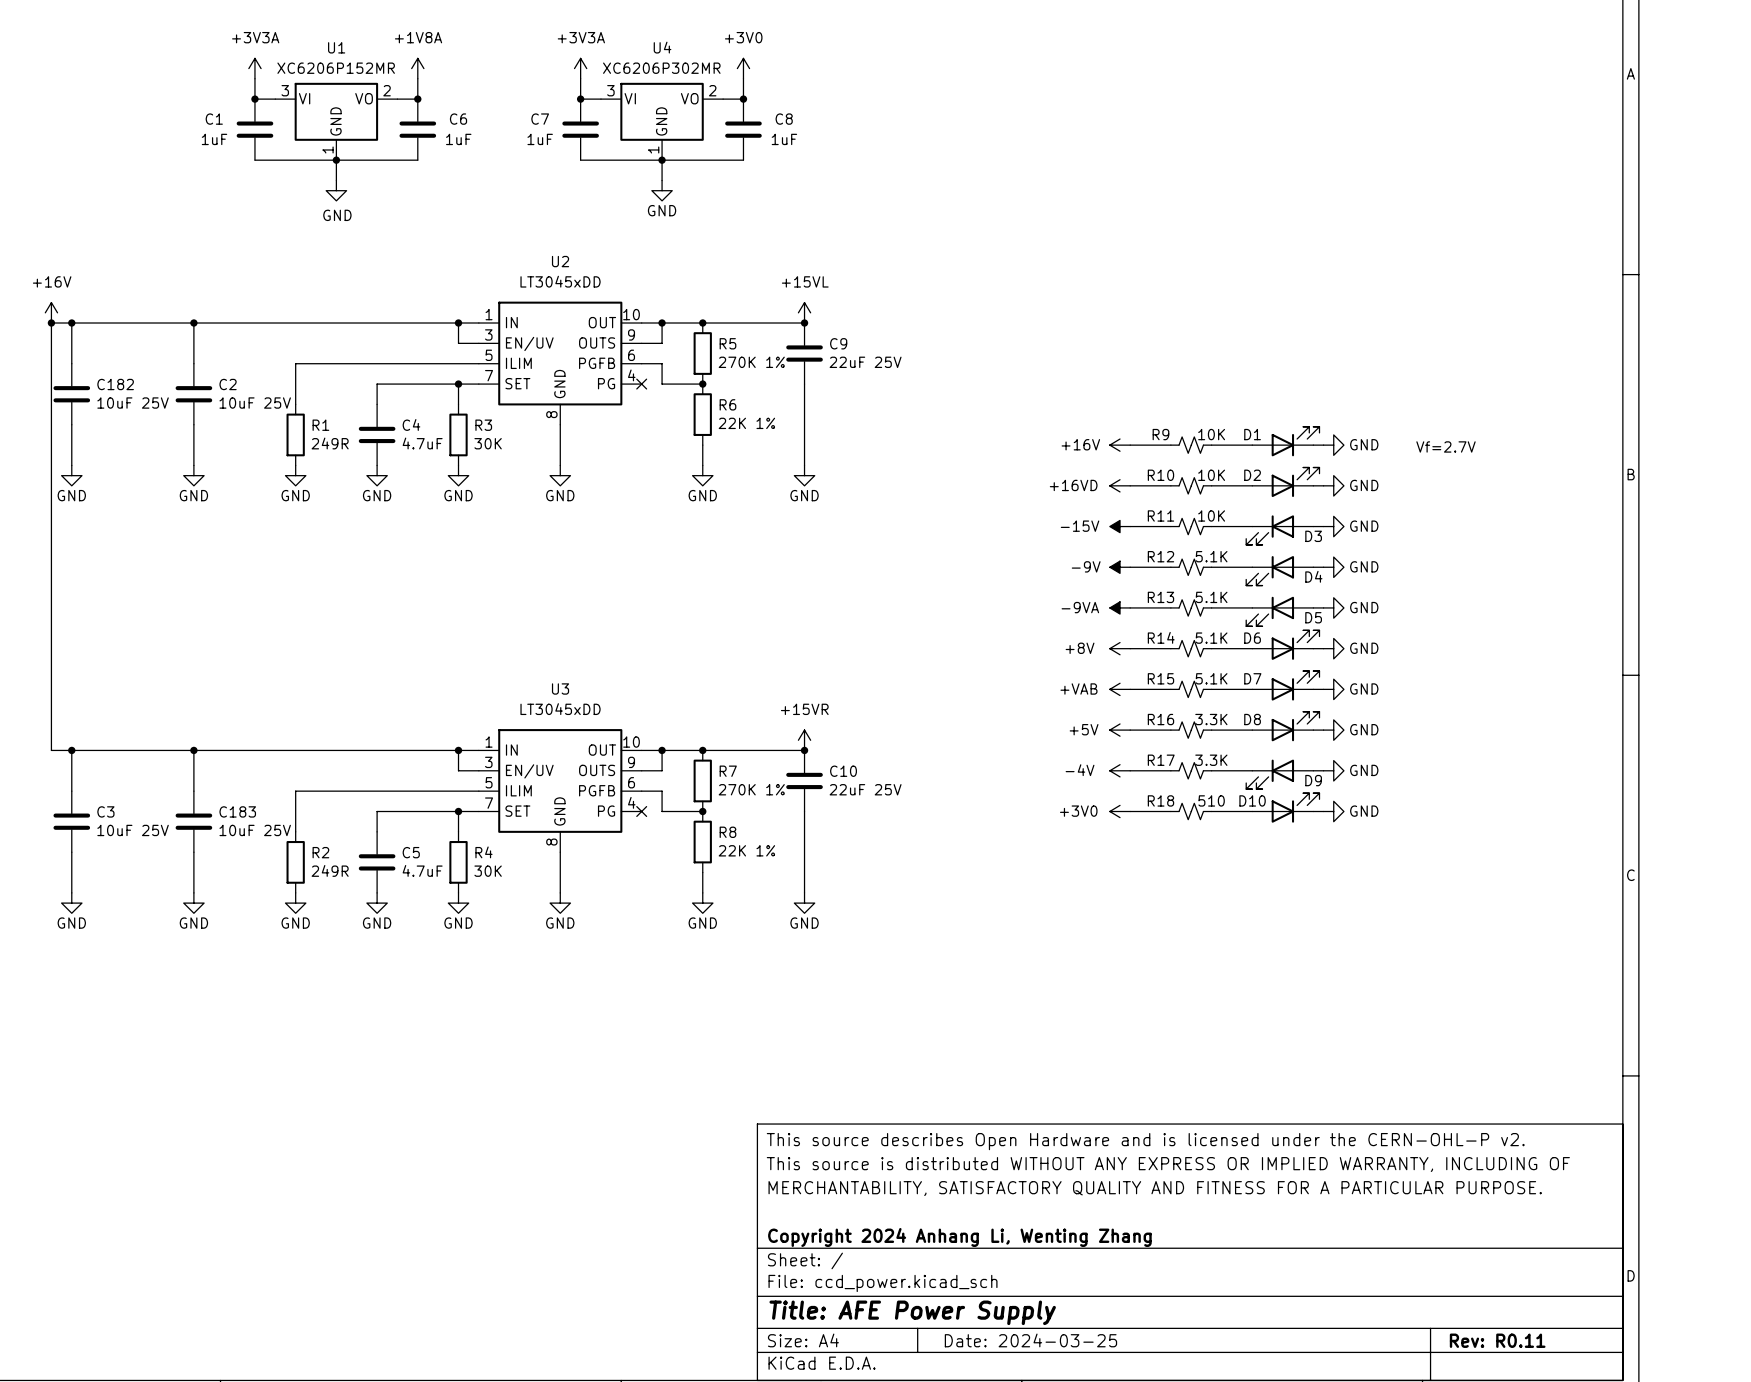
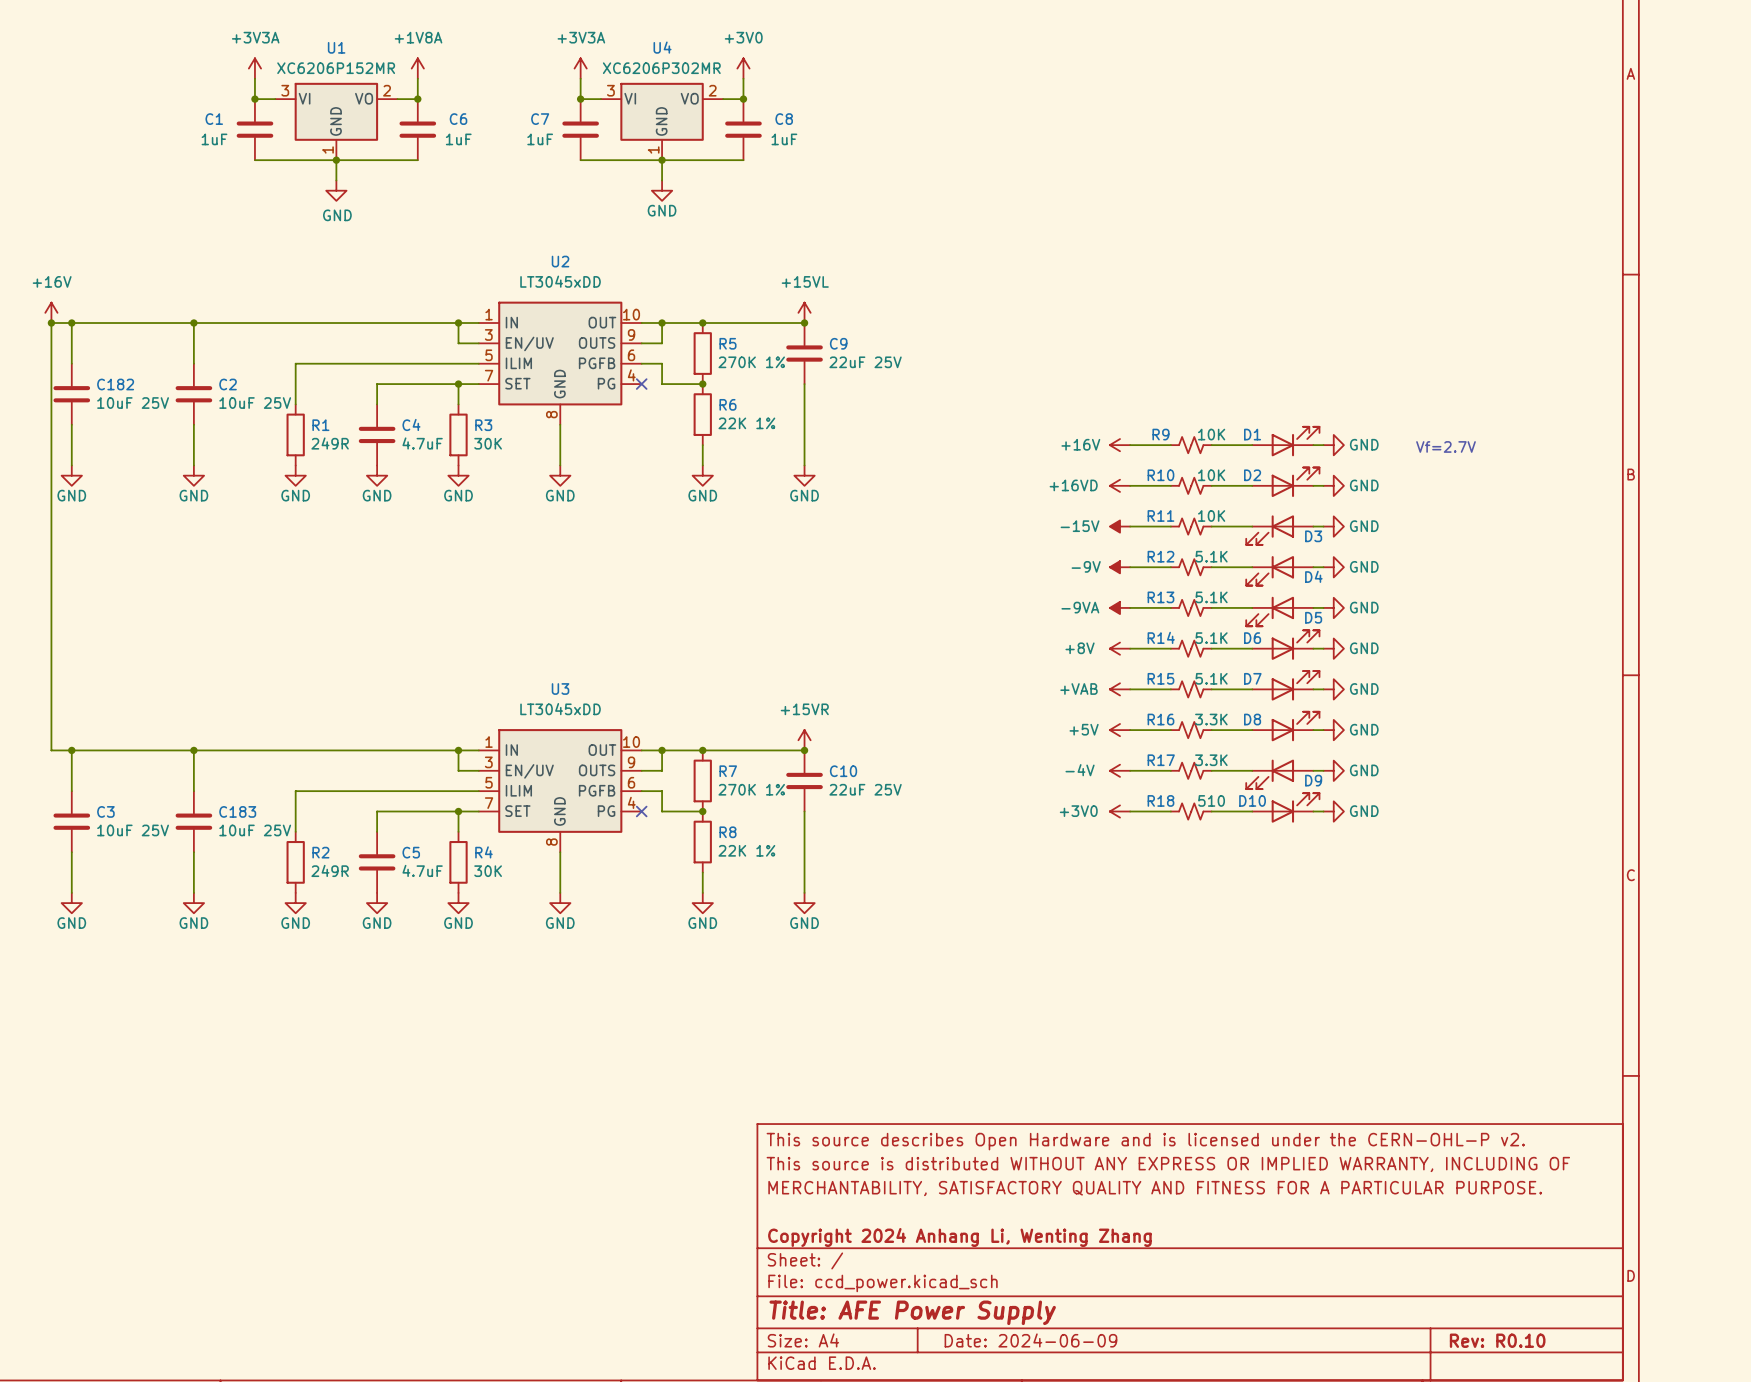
title block: Date: 2024-03-25 (1030, 1340) -> Date: 2024-06-09 (1030, 1340)
title block: Rev: R0.11 (1497, 1340) -> Rev: R0.10 (1497, 1340)

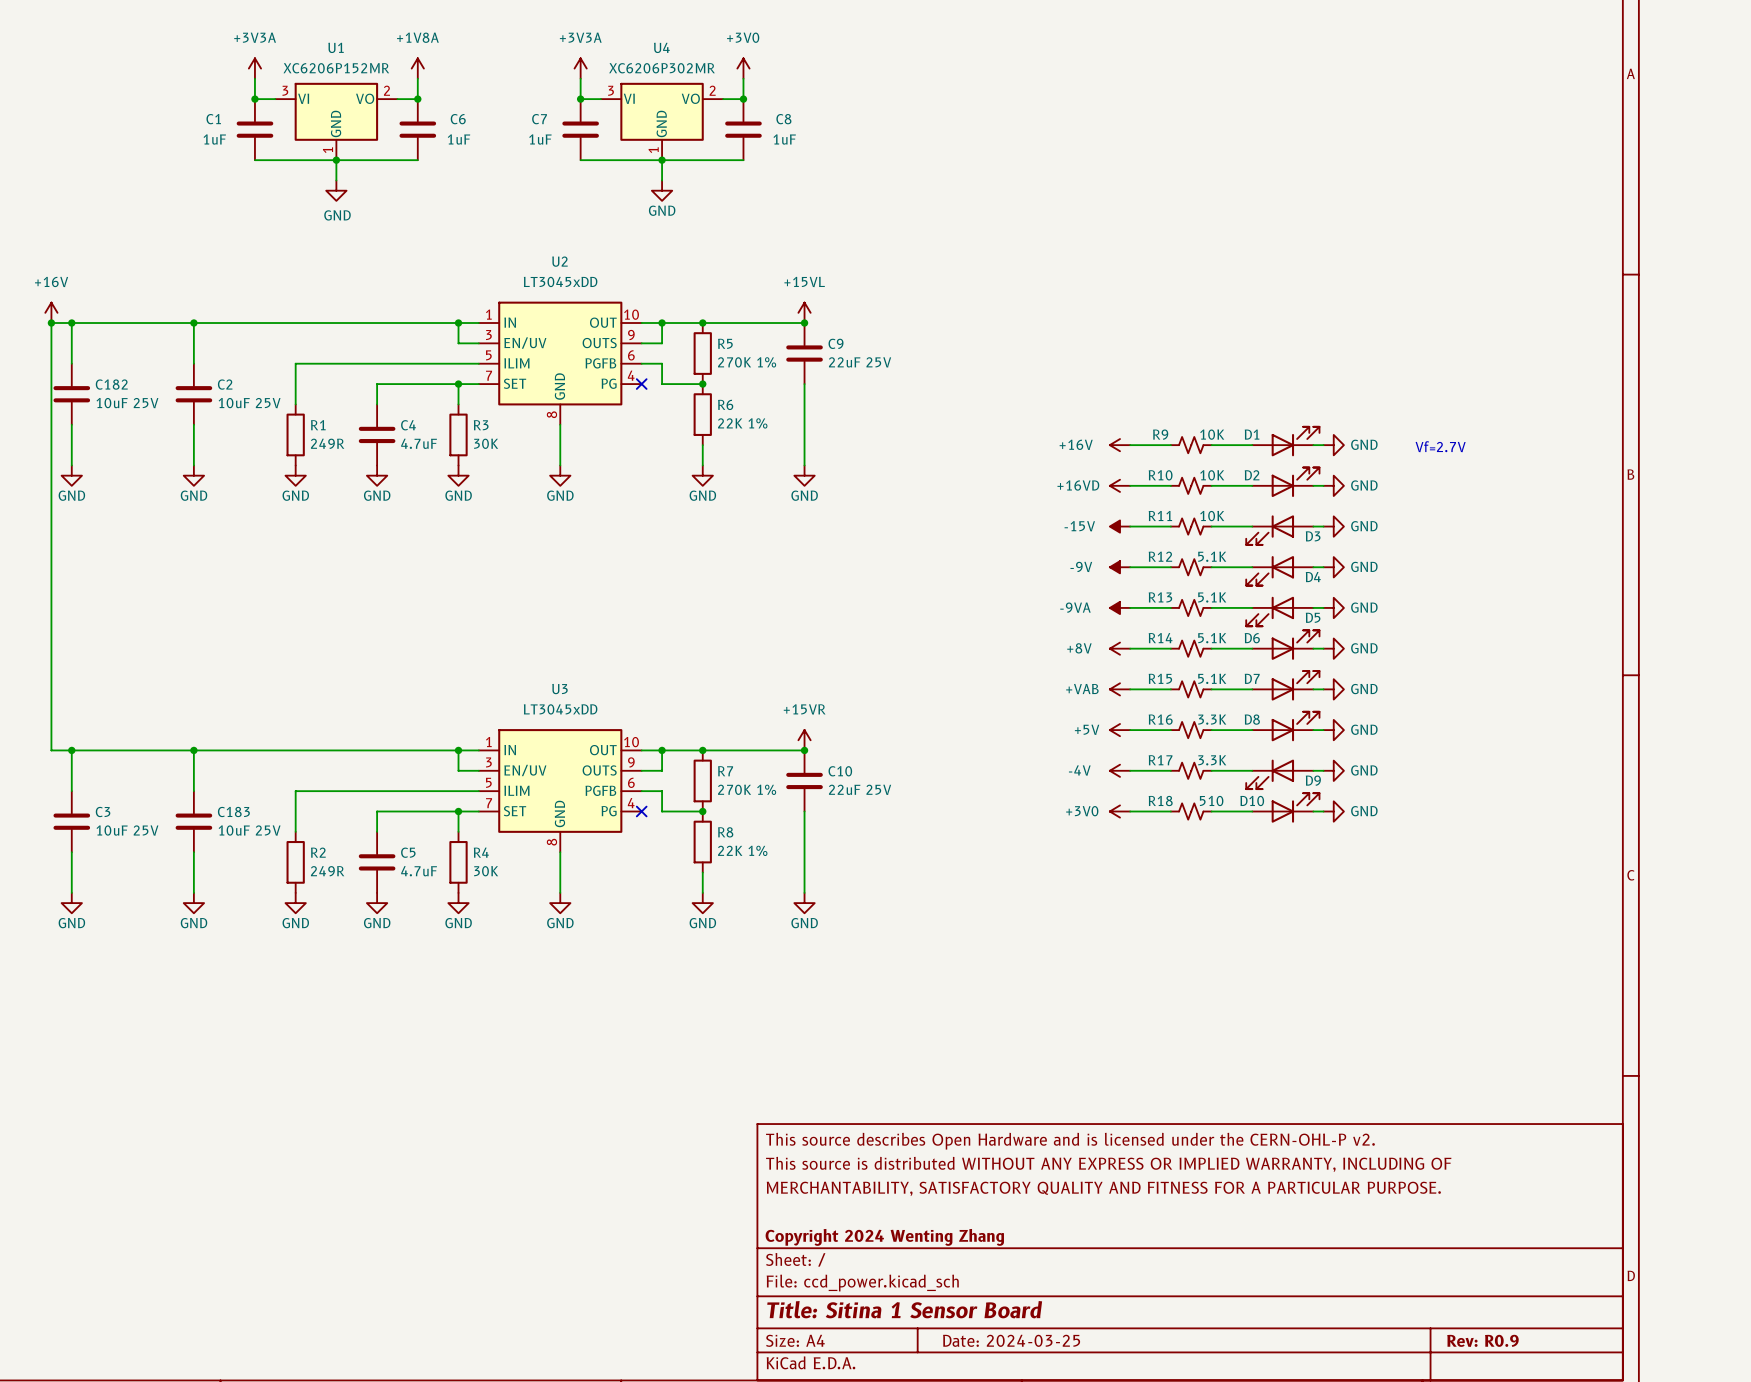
title block: Copyright 2024 Anhang Li, Wenting Zhang (959, 1237) -> Copyright 2024 Wenting Zhang (884, 1237)
title block: Title: AFE Power Supply (912, 1312) -> Title: Sitina 1 Sensor Board (904, 1309)
title block: Date: 2024-06-09 (1030, 1340) -> Date: 2024-03-25 (1011, 1340)
title block: Rev: R0.10 (1497, 1340) -> Rev: R0.9 (1482, 1340)

